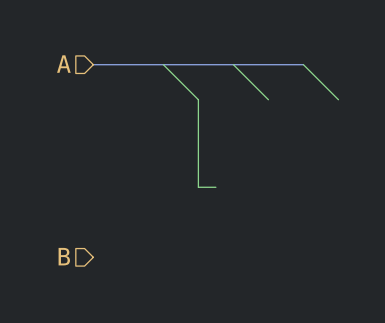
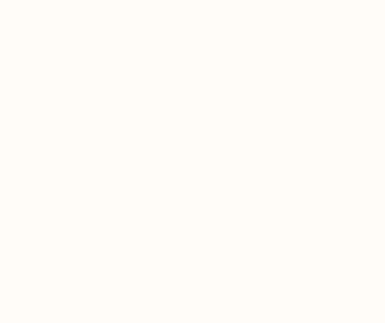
hierarchical label: A (63, 64) -> none
bus: (93, 64) (303, 64) -> none
wire: (163, 64) (198, 99) (198, 187) (215, 187) -> none
wire: (233, 64) (268, 99) -> none
wire: (303, 64) (338, 99) -> none
hierarchical label: B (64, 256) -> none

